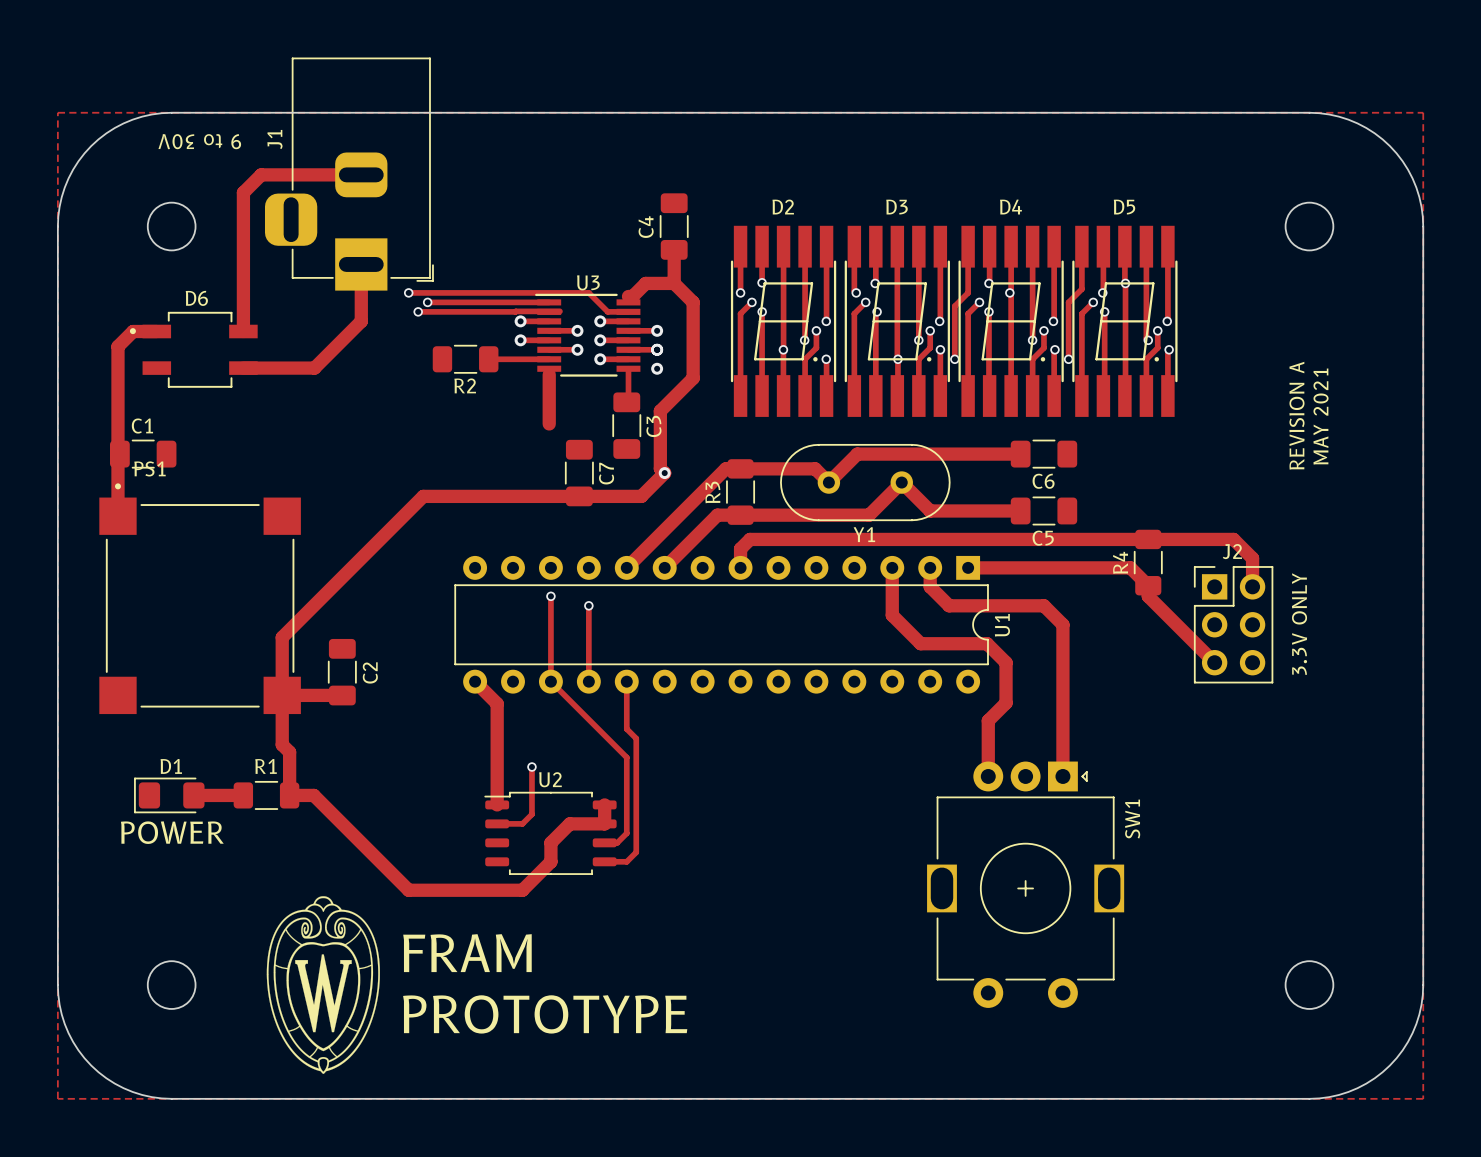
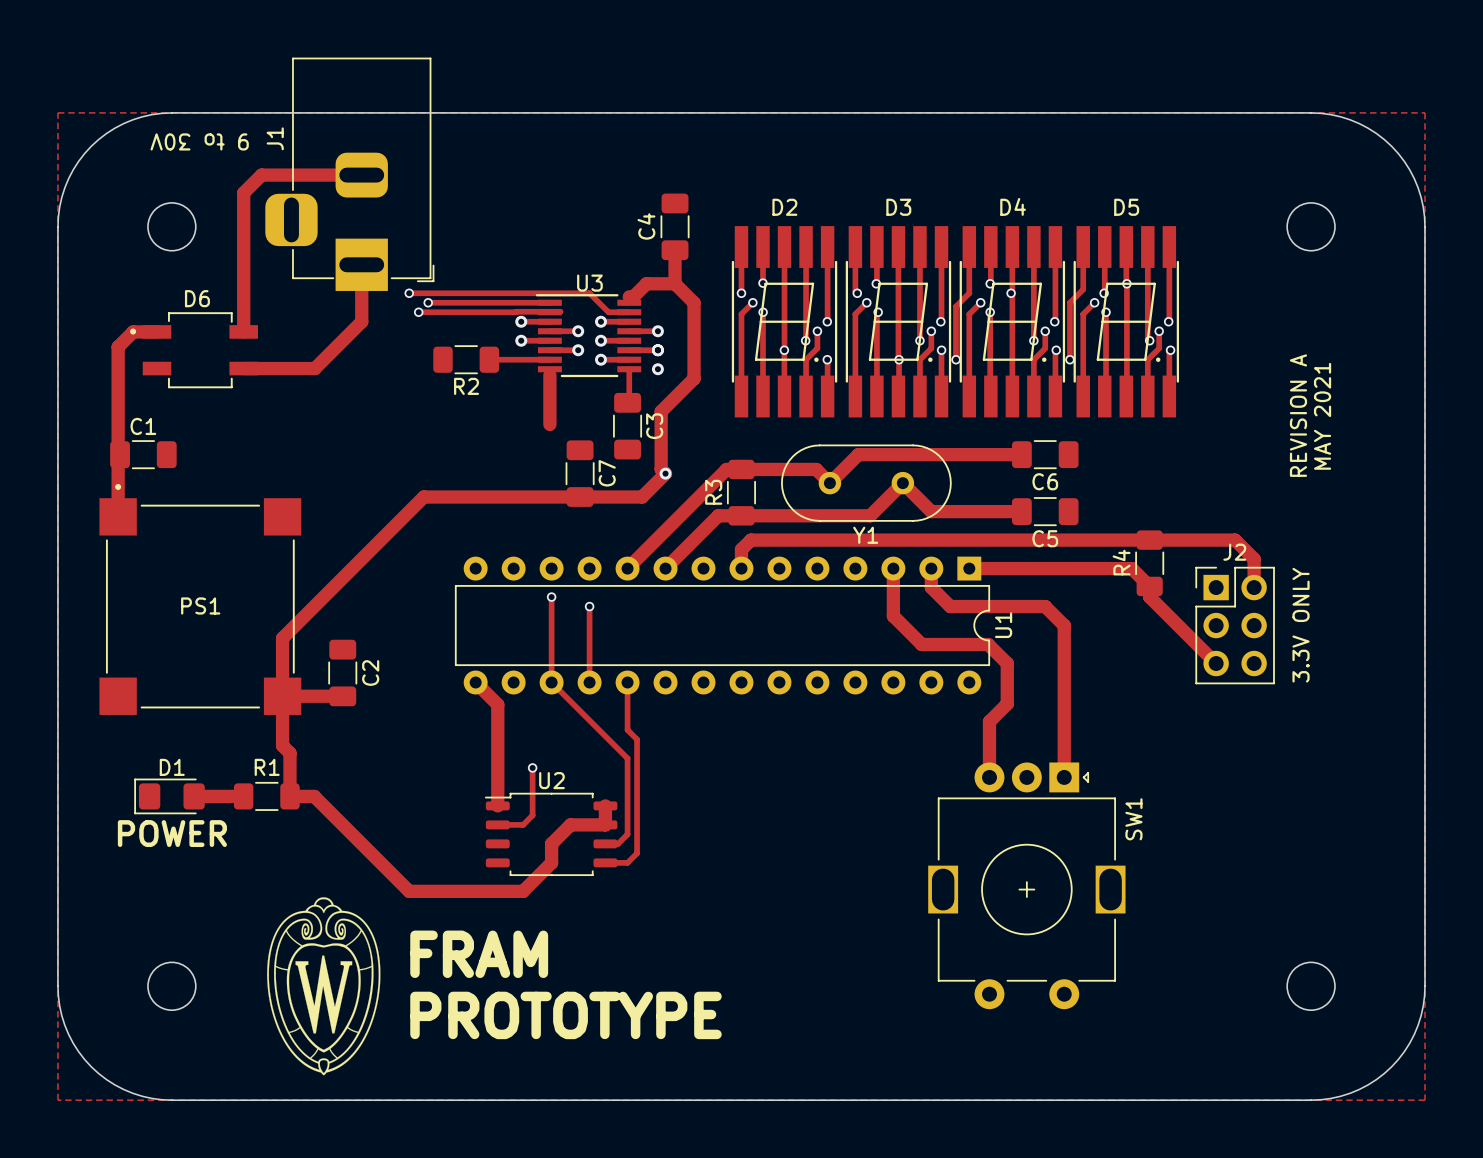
PS1 name position: PS1 (150, 468) -> PS1 (200, 605)

